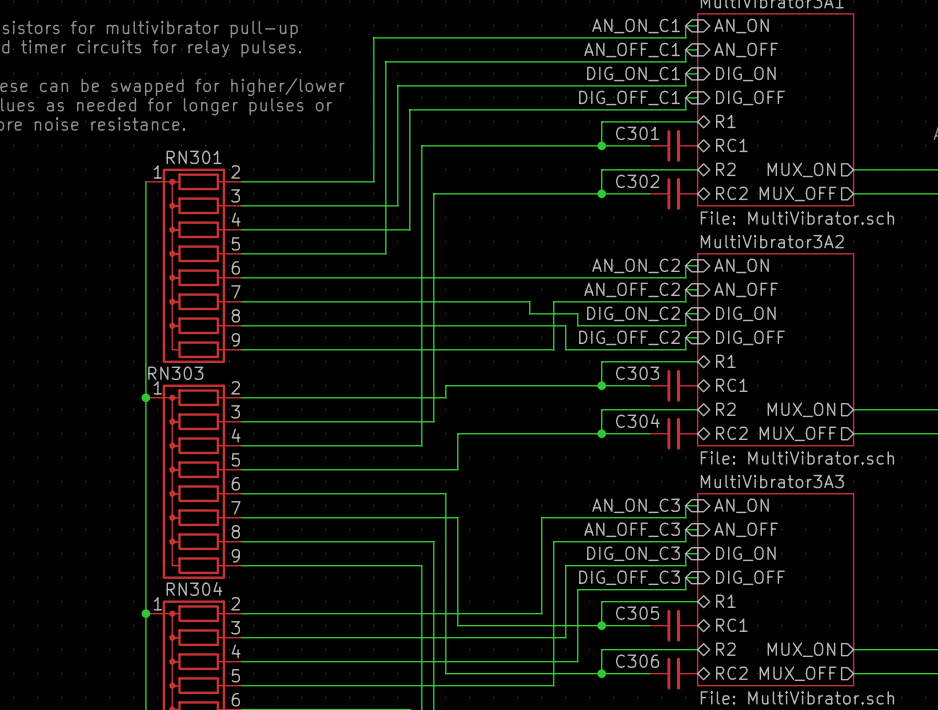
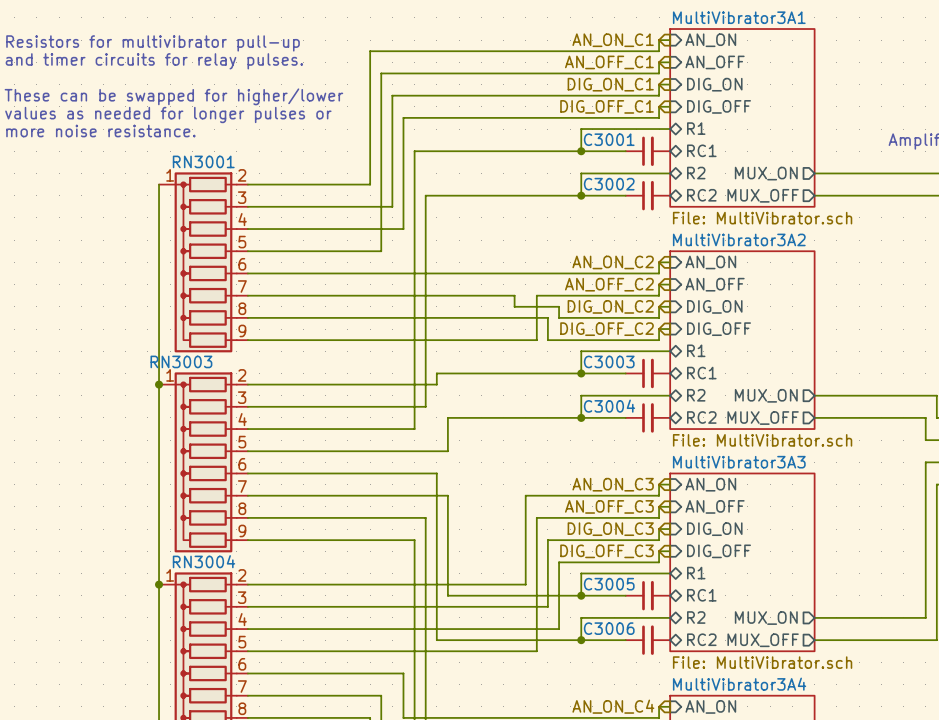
C301 name: C301 (637, 133) -> C3001 (609, 139)
RN301 name: RN301 (194, 157) -> RN3001 (203, 161)
C302 name: C302 (637, 181) -> C3002 (609, 184)
RN303 name: RN303 (175, 373) -> RN3003 (181, 361)
C303 name: C303 (637, 373) -> C3003 (609, 361)
C304 name: C304 (637, 421) -> C3004 (609, 406)
RN304 name: RN304 (194, 588) -> RN3004 (204, 561)
C305 name: C305 (637, 613) -> C3005 (609, 584)
C306 name: C306 (637, 661) -> C3006 (609, 628)

